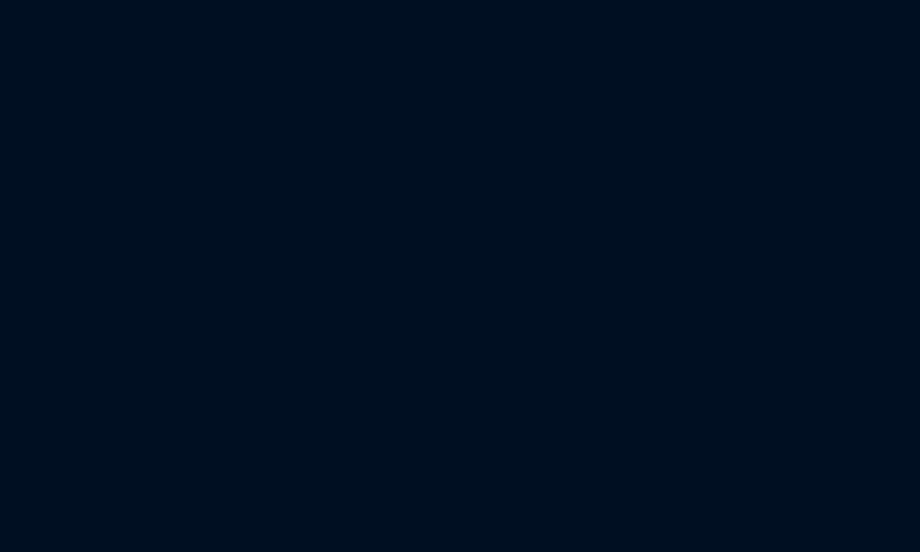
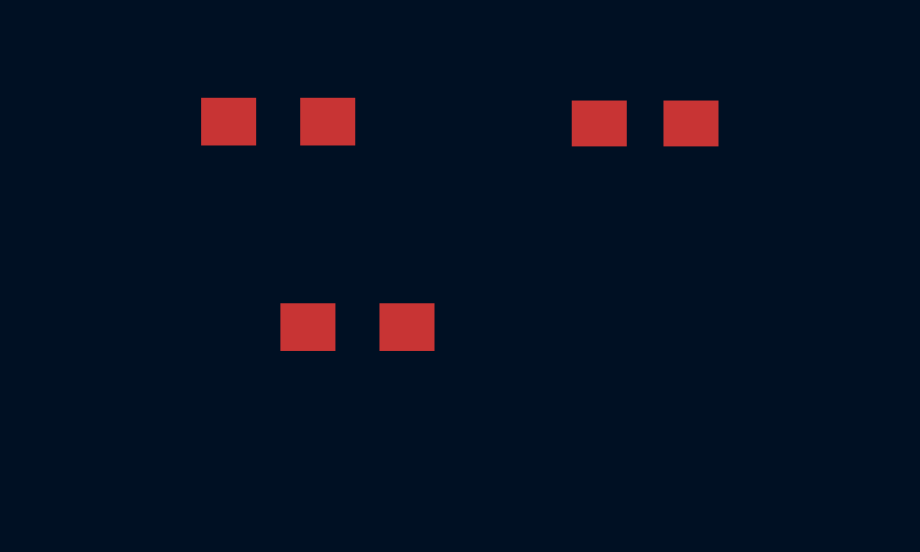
part: none -> (278, 121)
part: none -> (645, 123)
part: none -> (357, 327)

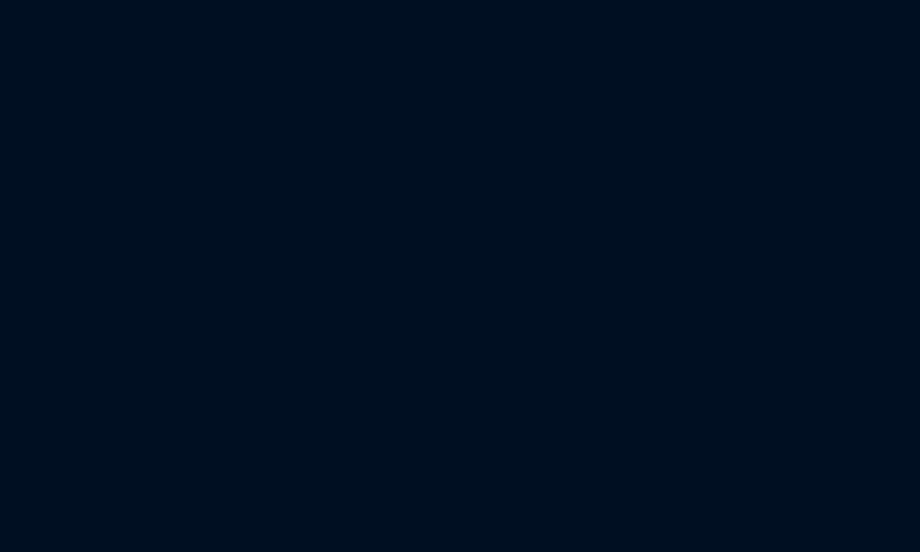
part: (278, 121) -> none
part: (645, 123) -> none
part: (357, 327) -> none

